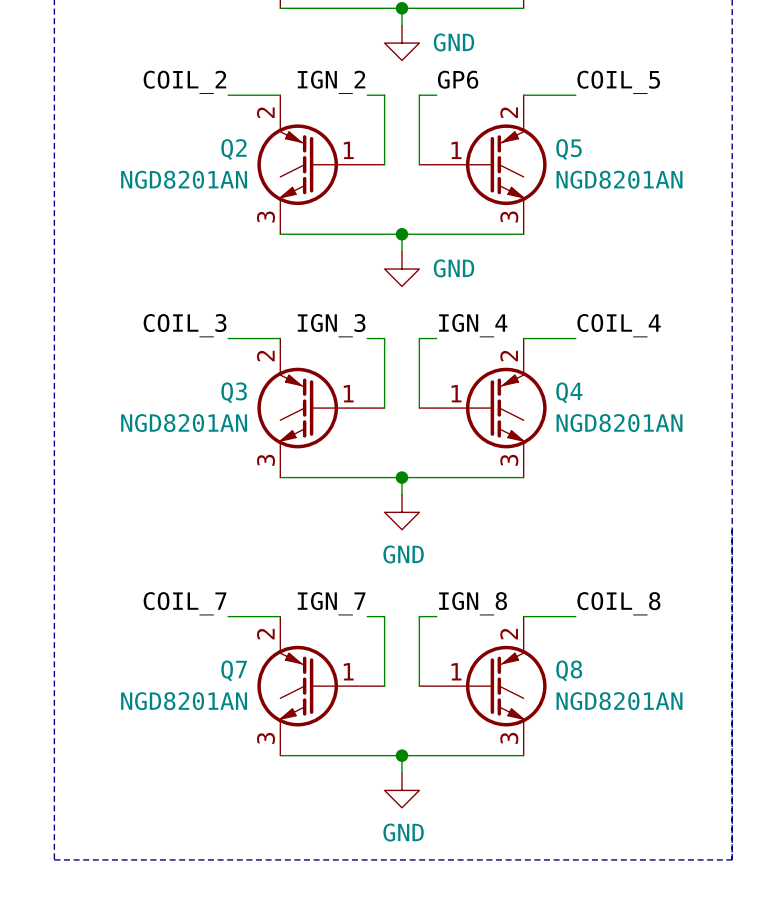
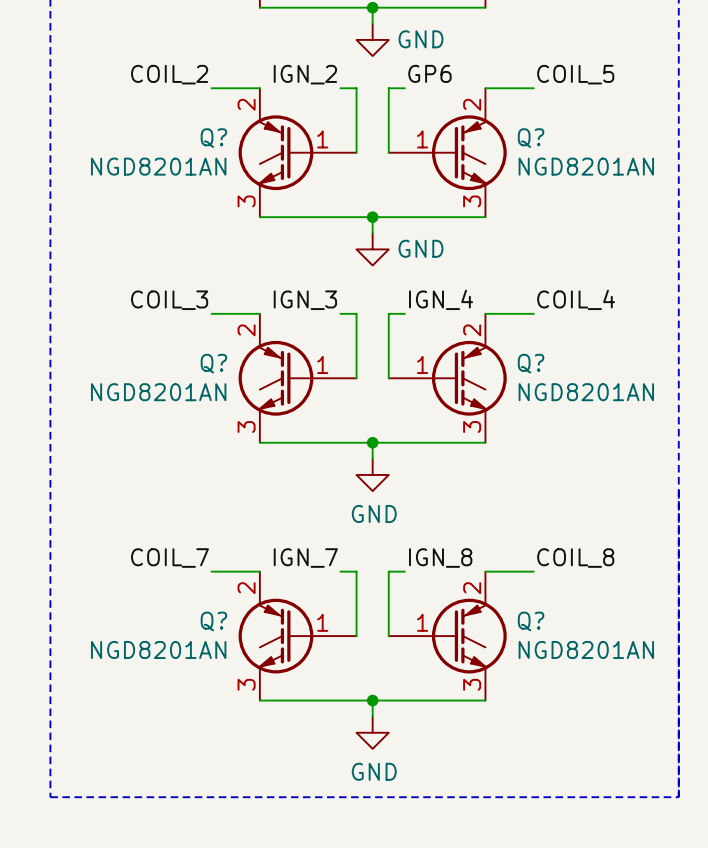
Q2 name: Q2 (234, 149) -> Q? (213, 138)
Q5 name: Q5 (569, 149) -> Q? (531, 138)
Q3 name: Q3 (234, 392) -> Q? (213, 363)
Q4 name: Q4 (569, 392) -> Q? (531, 363)
Q7 name: Q7 (234, 670) -> Q? (213, 621)
Q8 name: Q8 (569, 670) -> Q? (531, 621)

